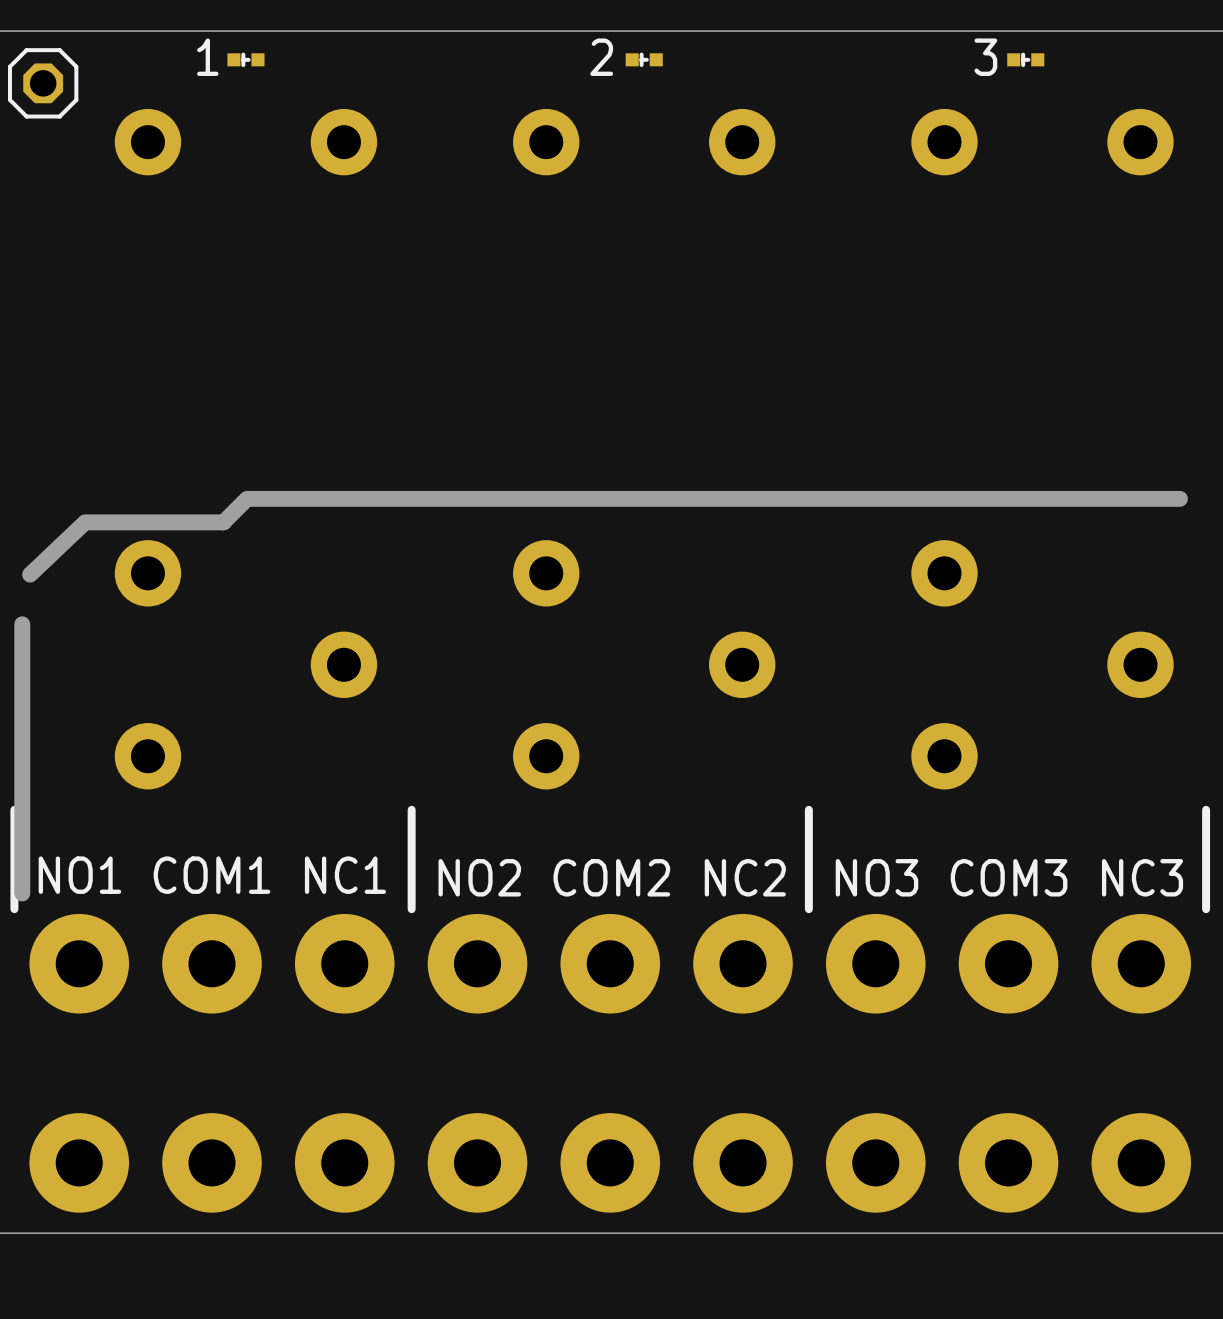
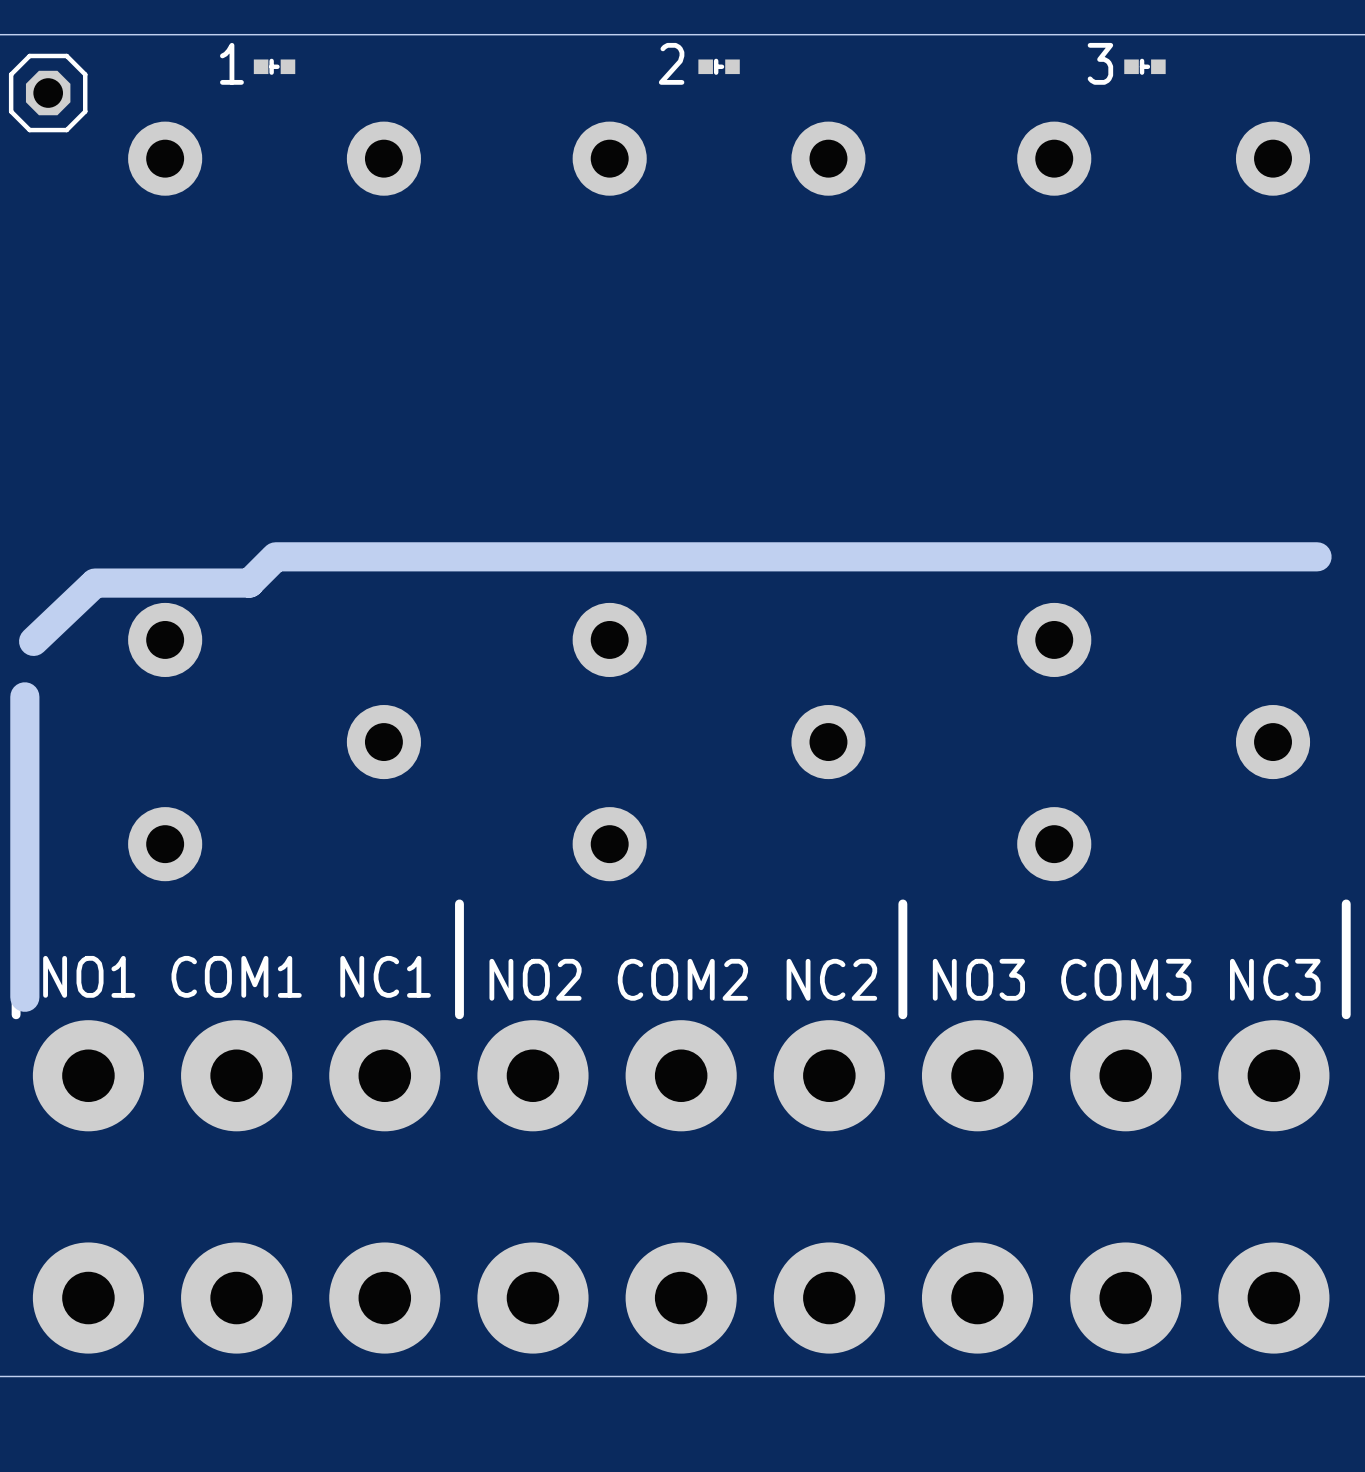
board edge width: thin (247, 498) (1179, 498) -> thick (275, 556) (1317, 556)
board edge width: thin (244, 501) (223, 522) (84, 522) -> thick (272, 559) (249, 583) (94, 583)
board edge width: thin (82, 524) (30, 574) -> thick (91, 585) (33, 641)
board edge width: thin (22, 624) (22, 893) -> thick (24, 696) (24, 997)

